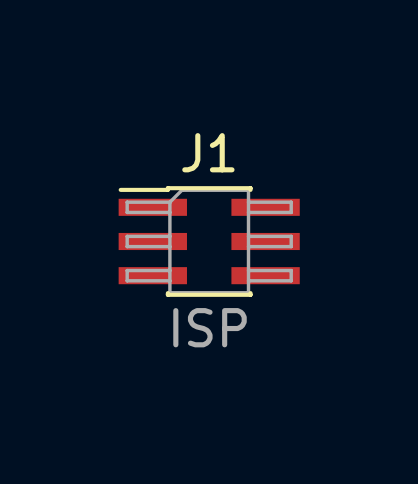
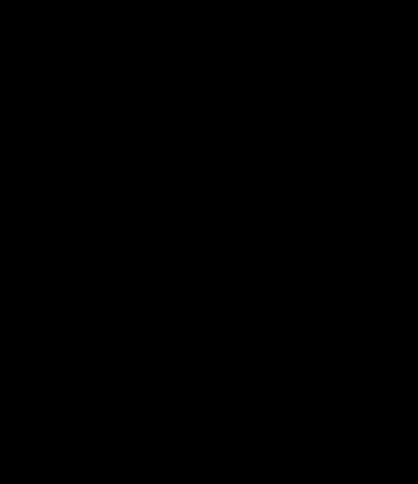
J1: ISP (209, 241) -> none

